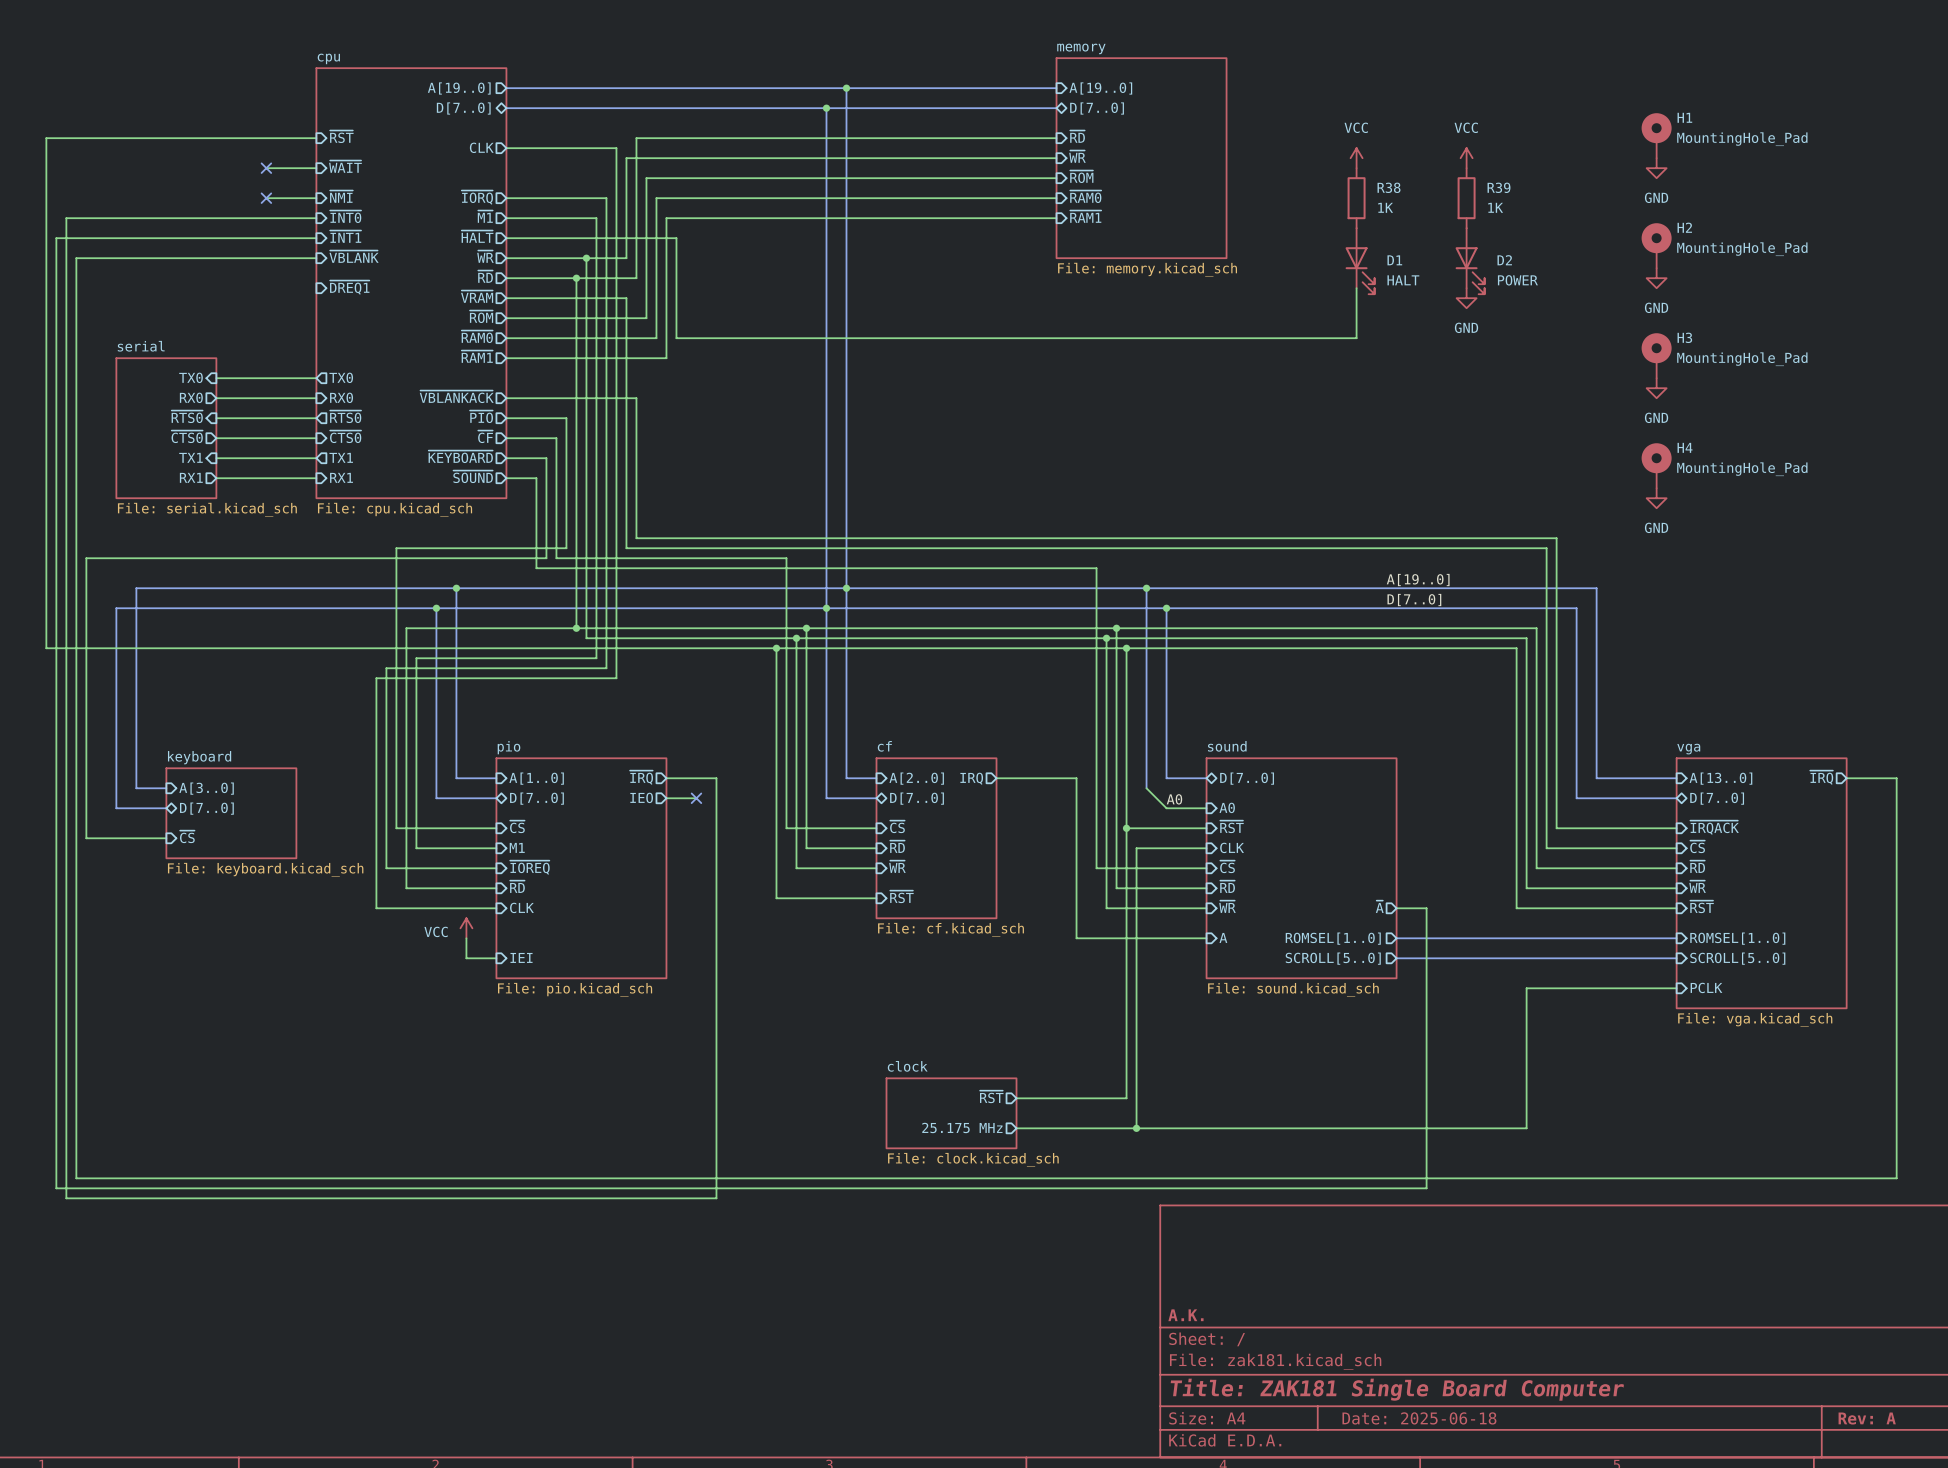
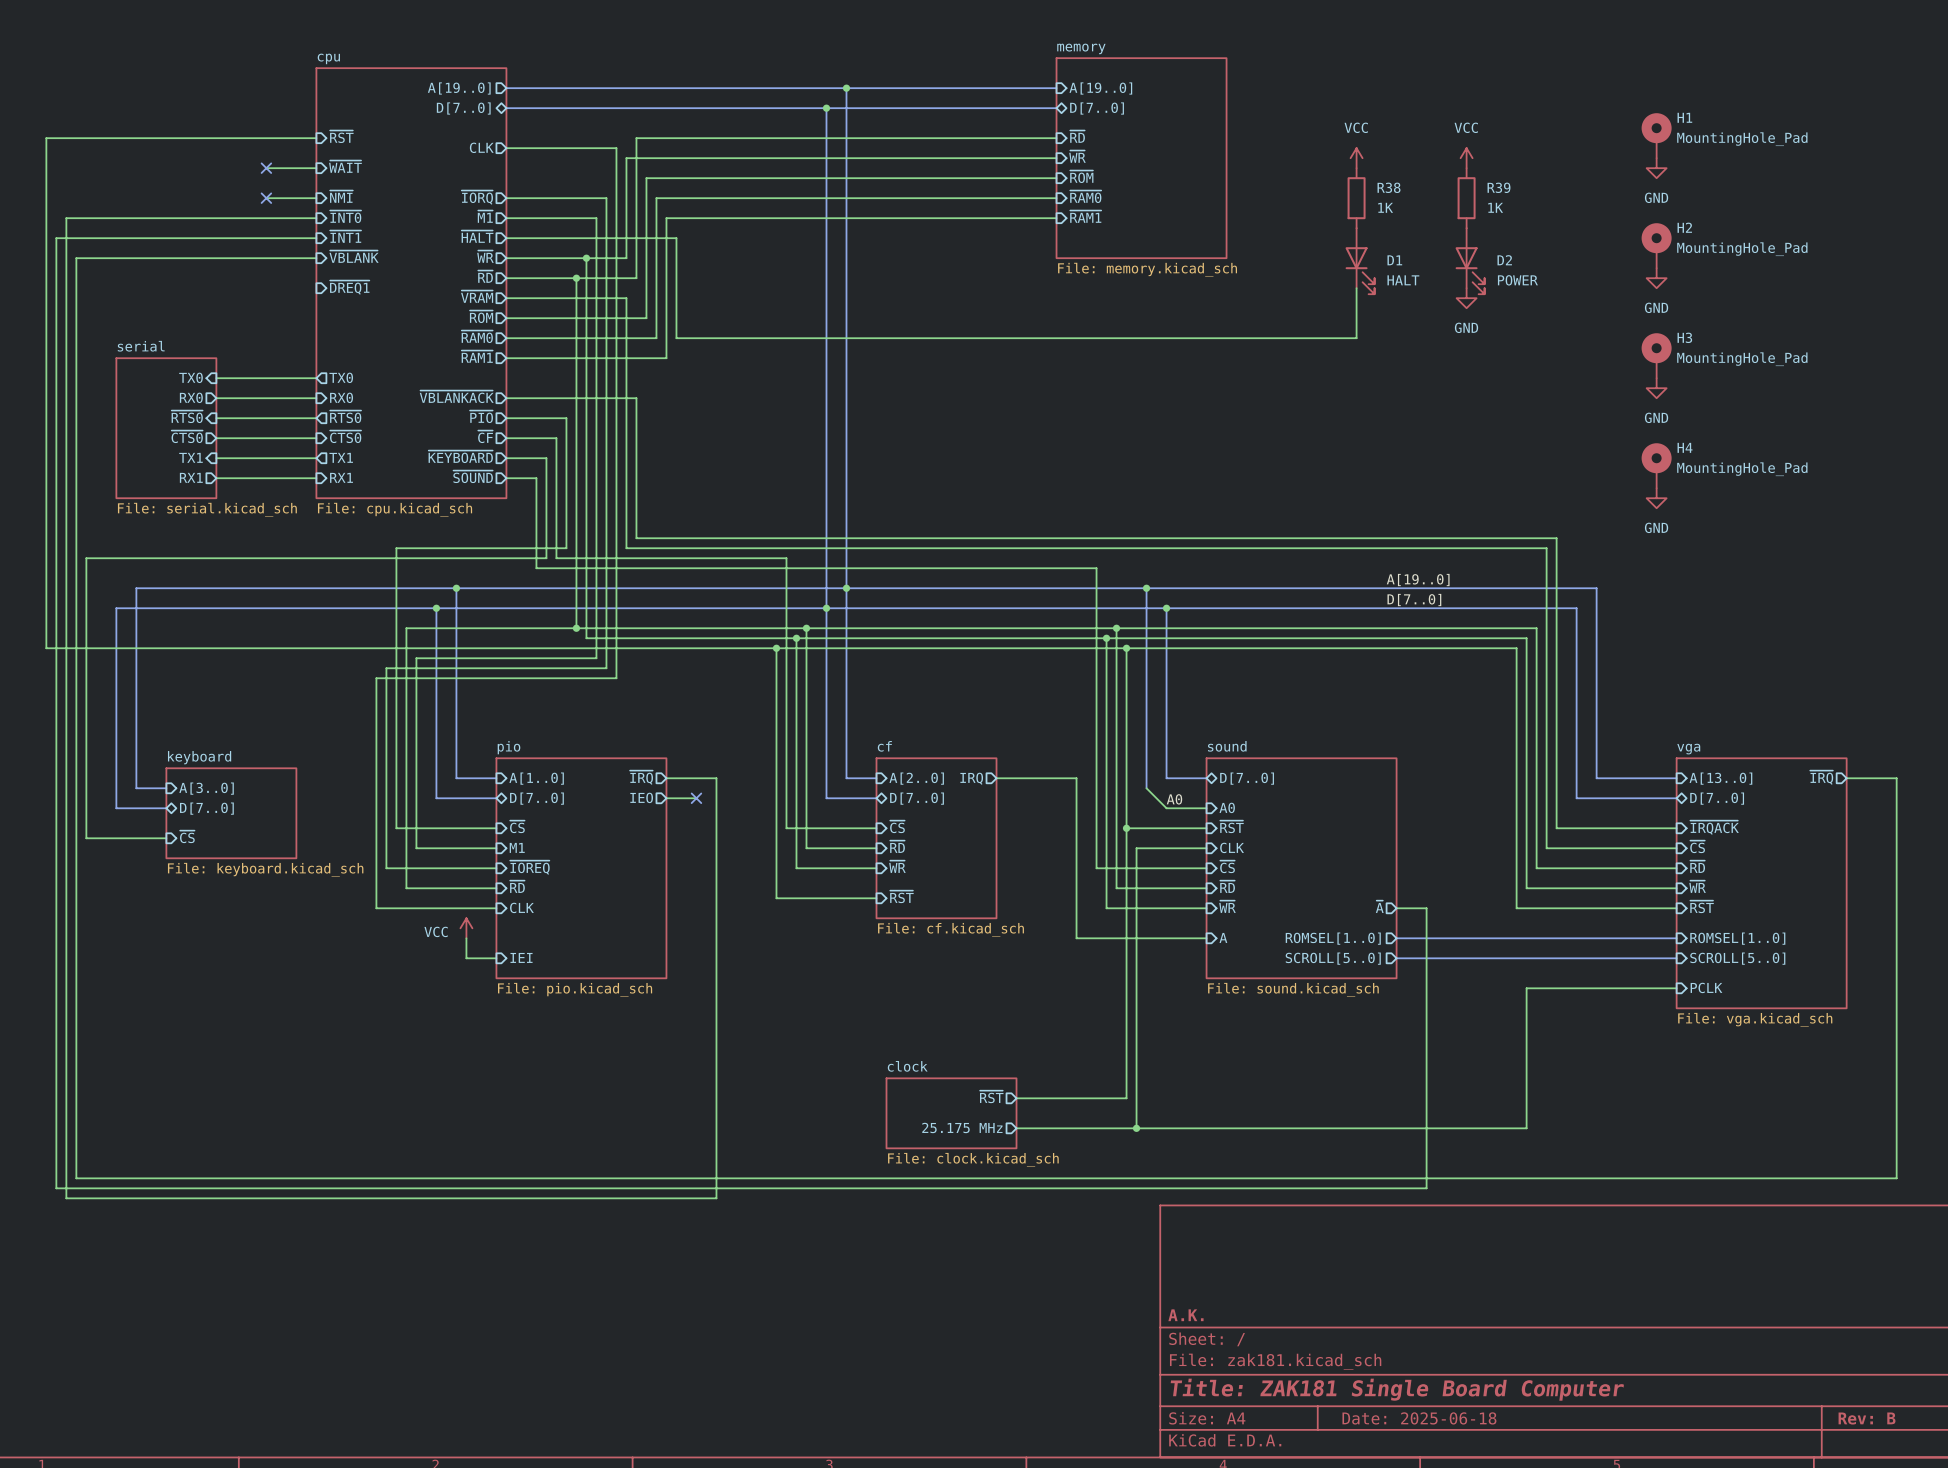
title block: Rev: A (1867, 1418) -> Rev: B (1867, 1418)

